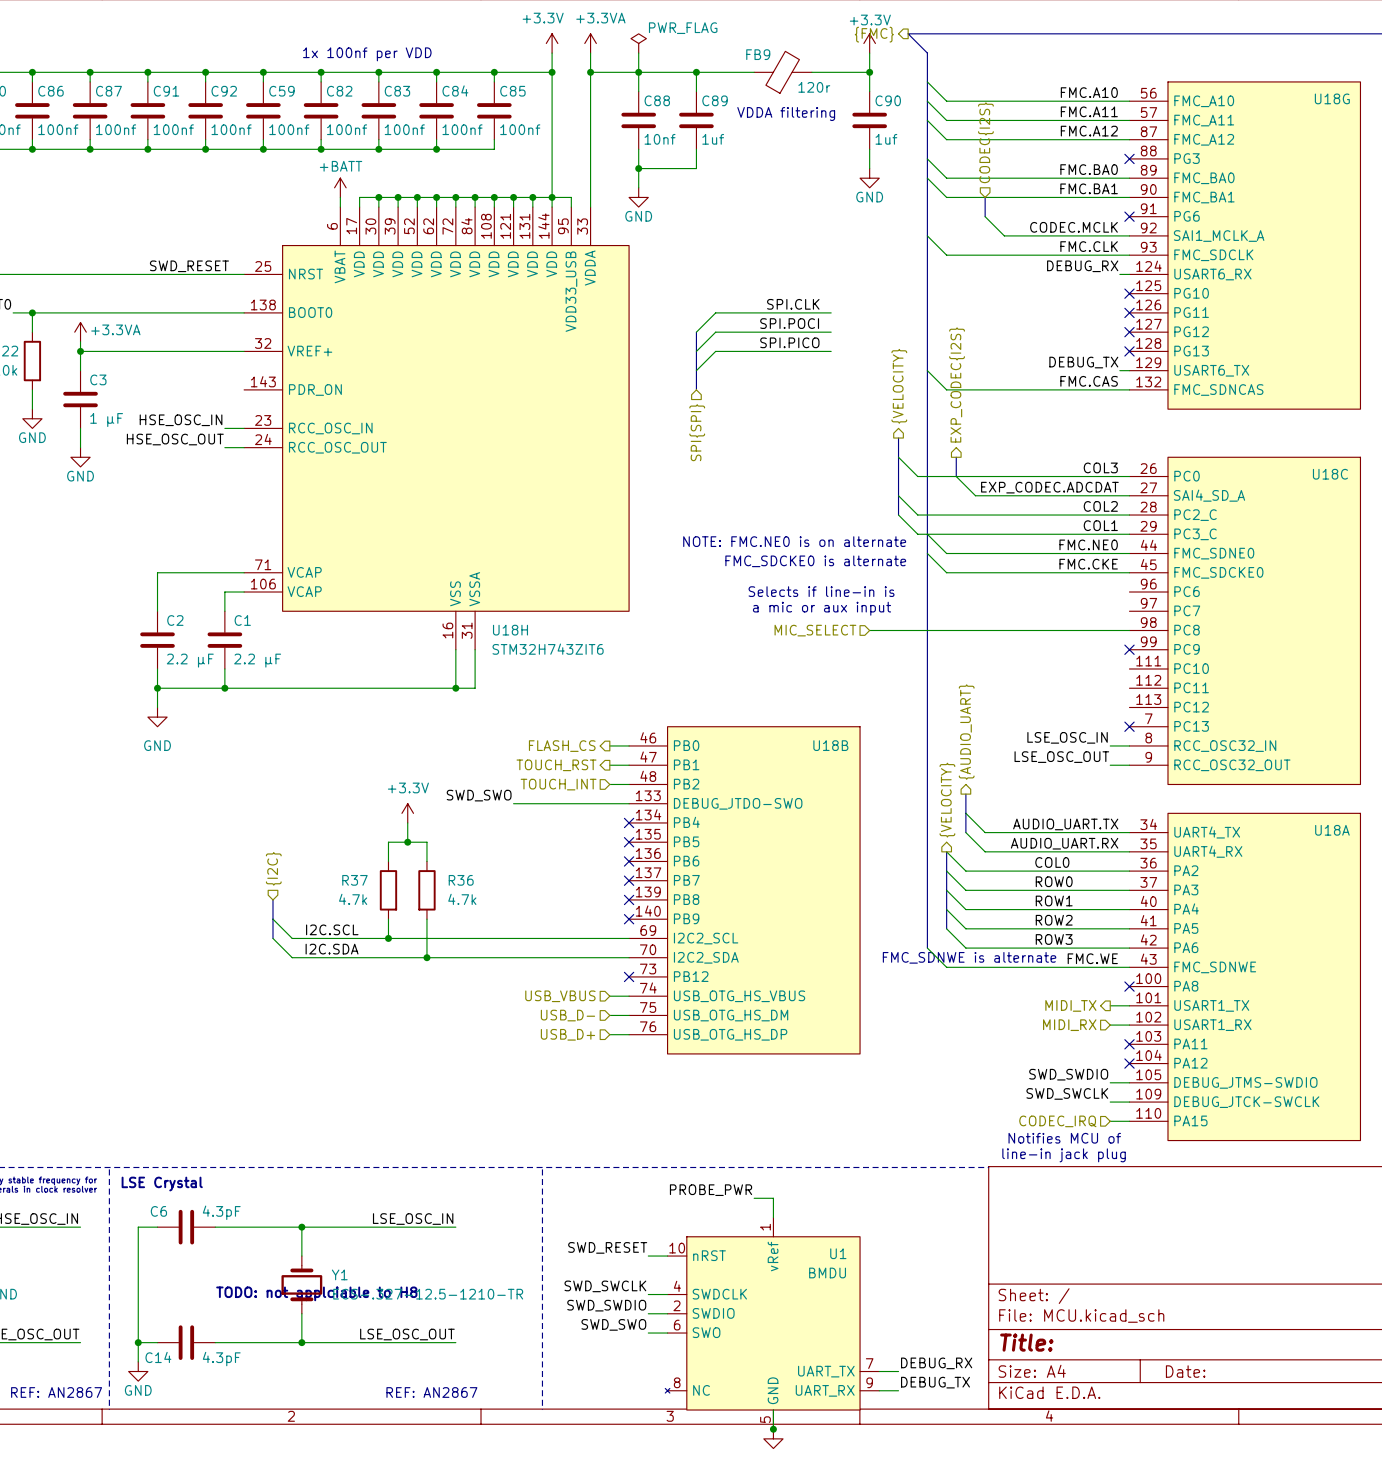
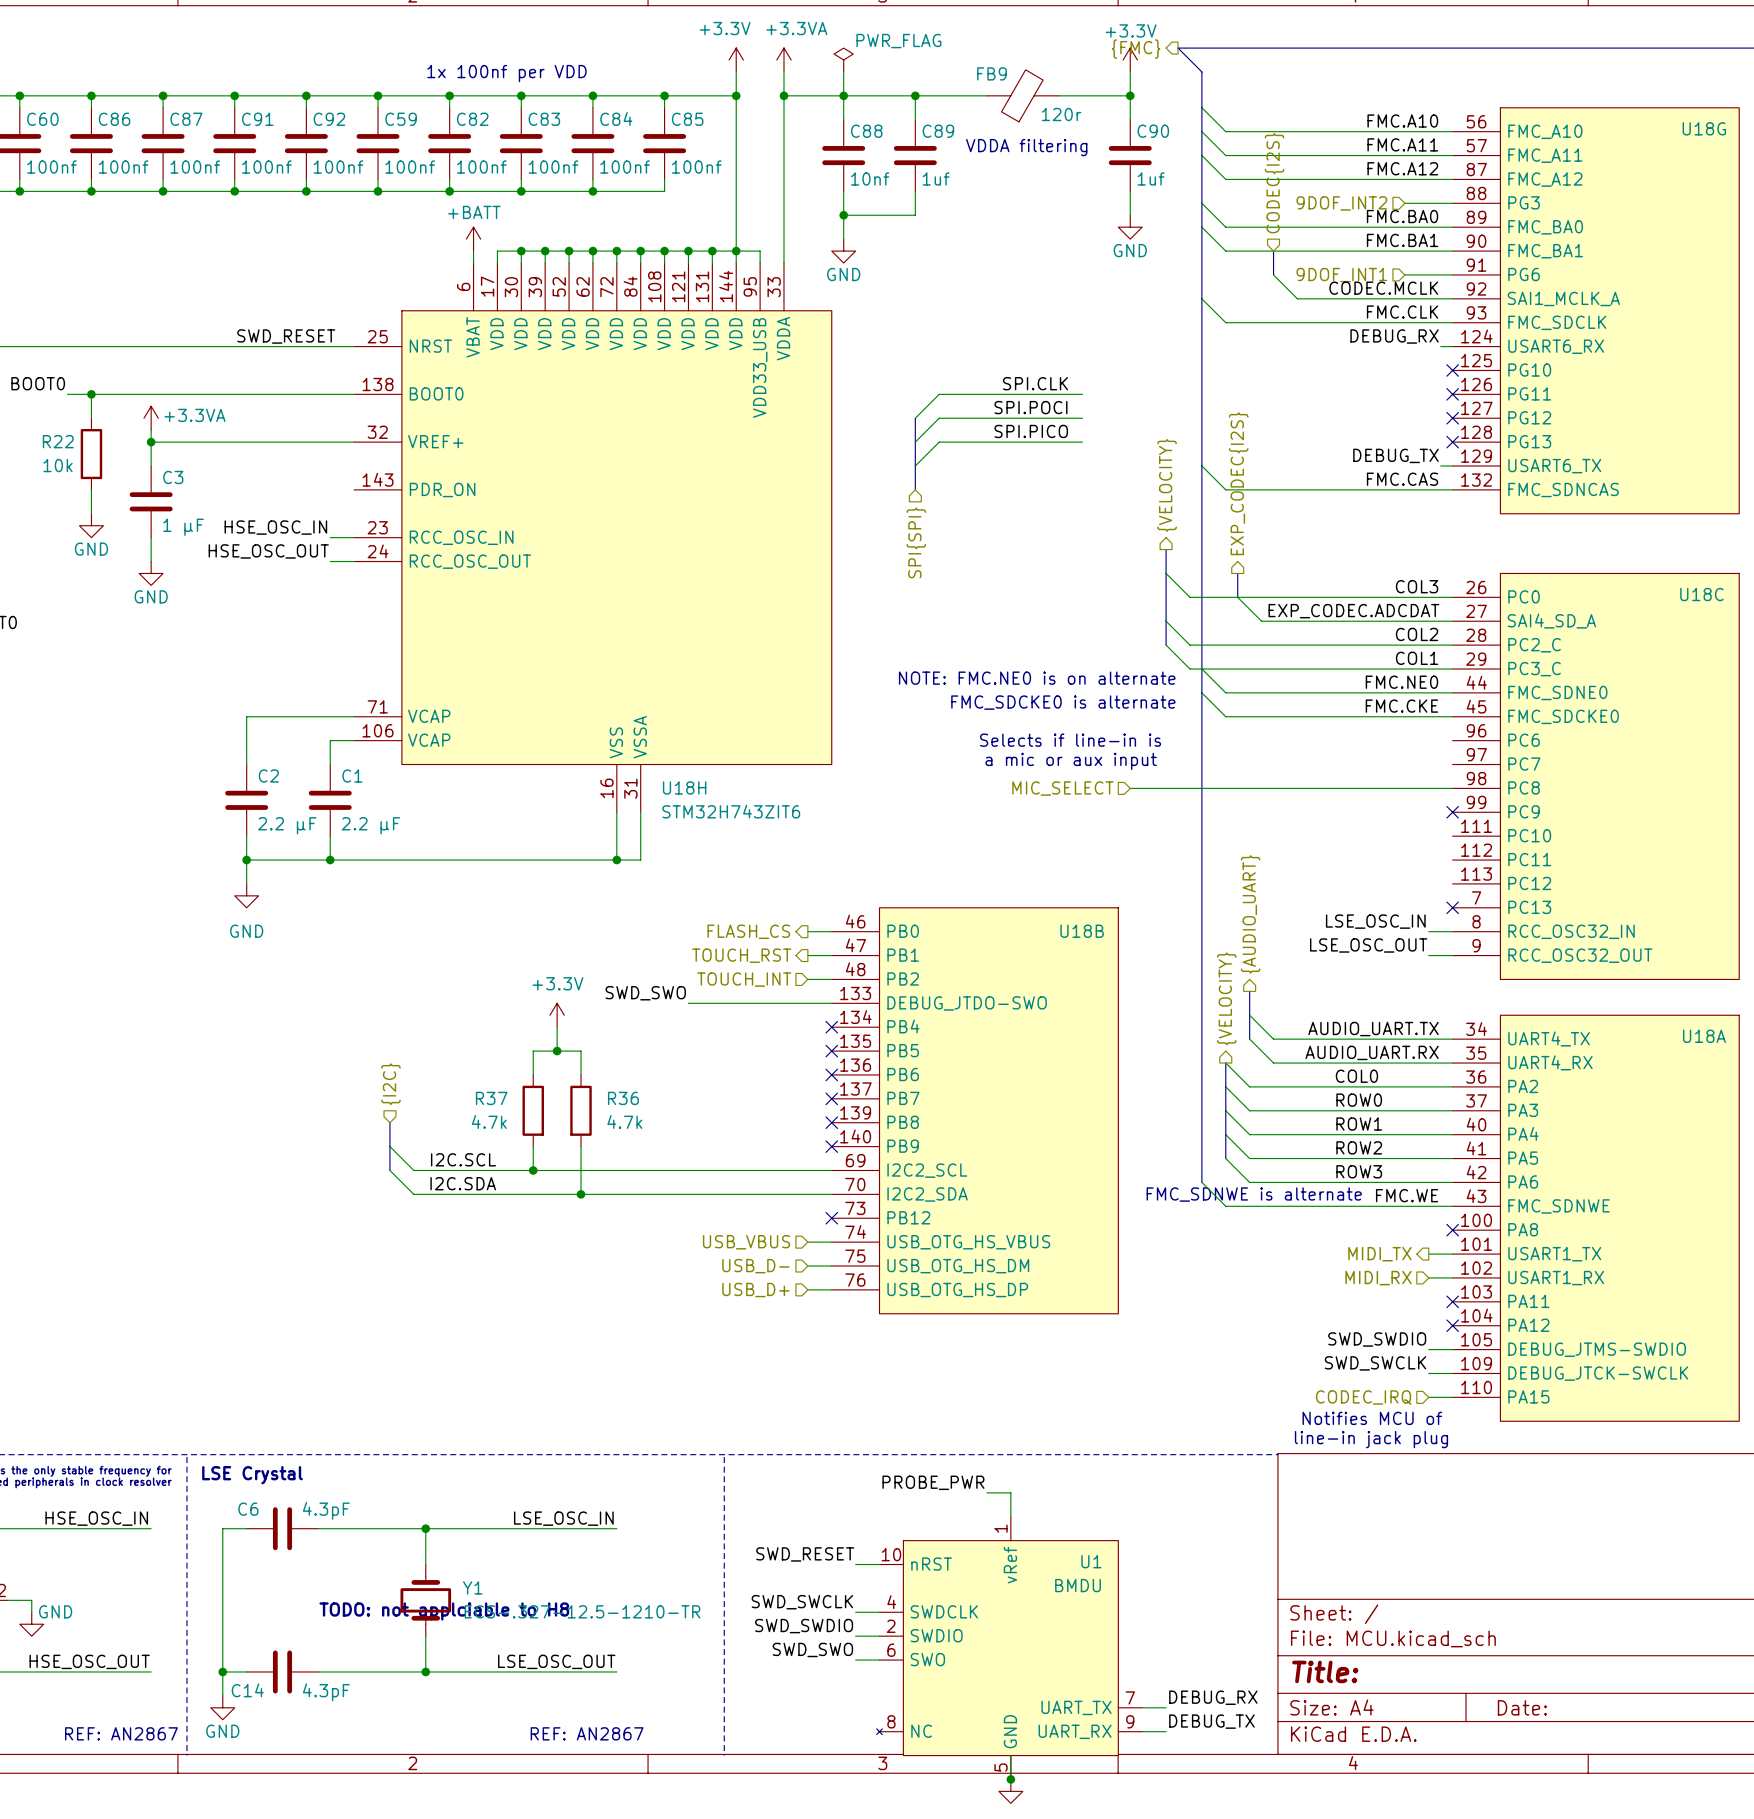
wire: none -> (1404, 203) (1452, 203)
no-connect mark: (1129, 158) -> none
hierarchical label: none -> 9DOF_INT2 (1341, 203)
hierarchical label: none -> 9DOF_INT1 (1341, 275)
wire: none -> (1404, 274) (1452, 274)
no-connect mark: (1129, 216) -> none

